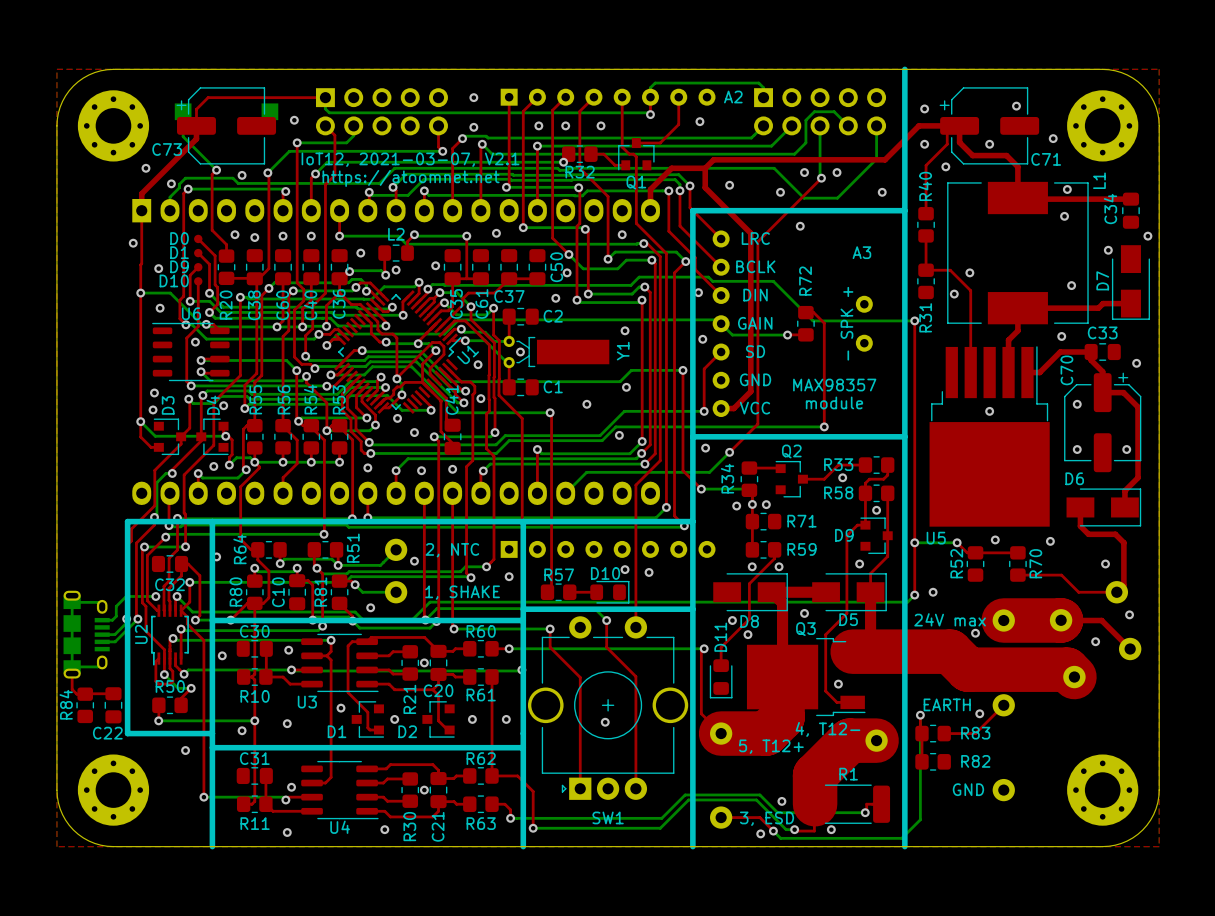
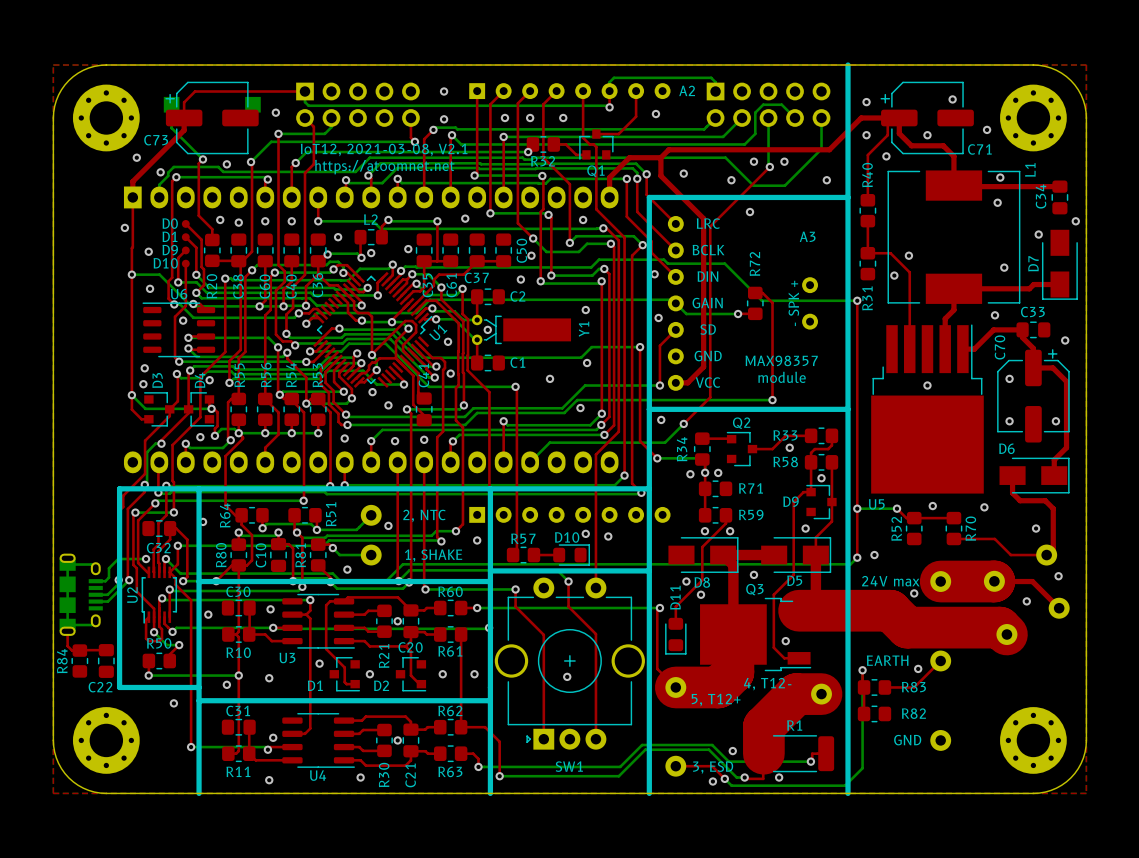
text: IoT12, 2021-03-07, V2.1 (410, 159) -> IoT12, 2021-03-08, V2.1 (384, 149)

